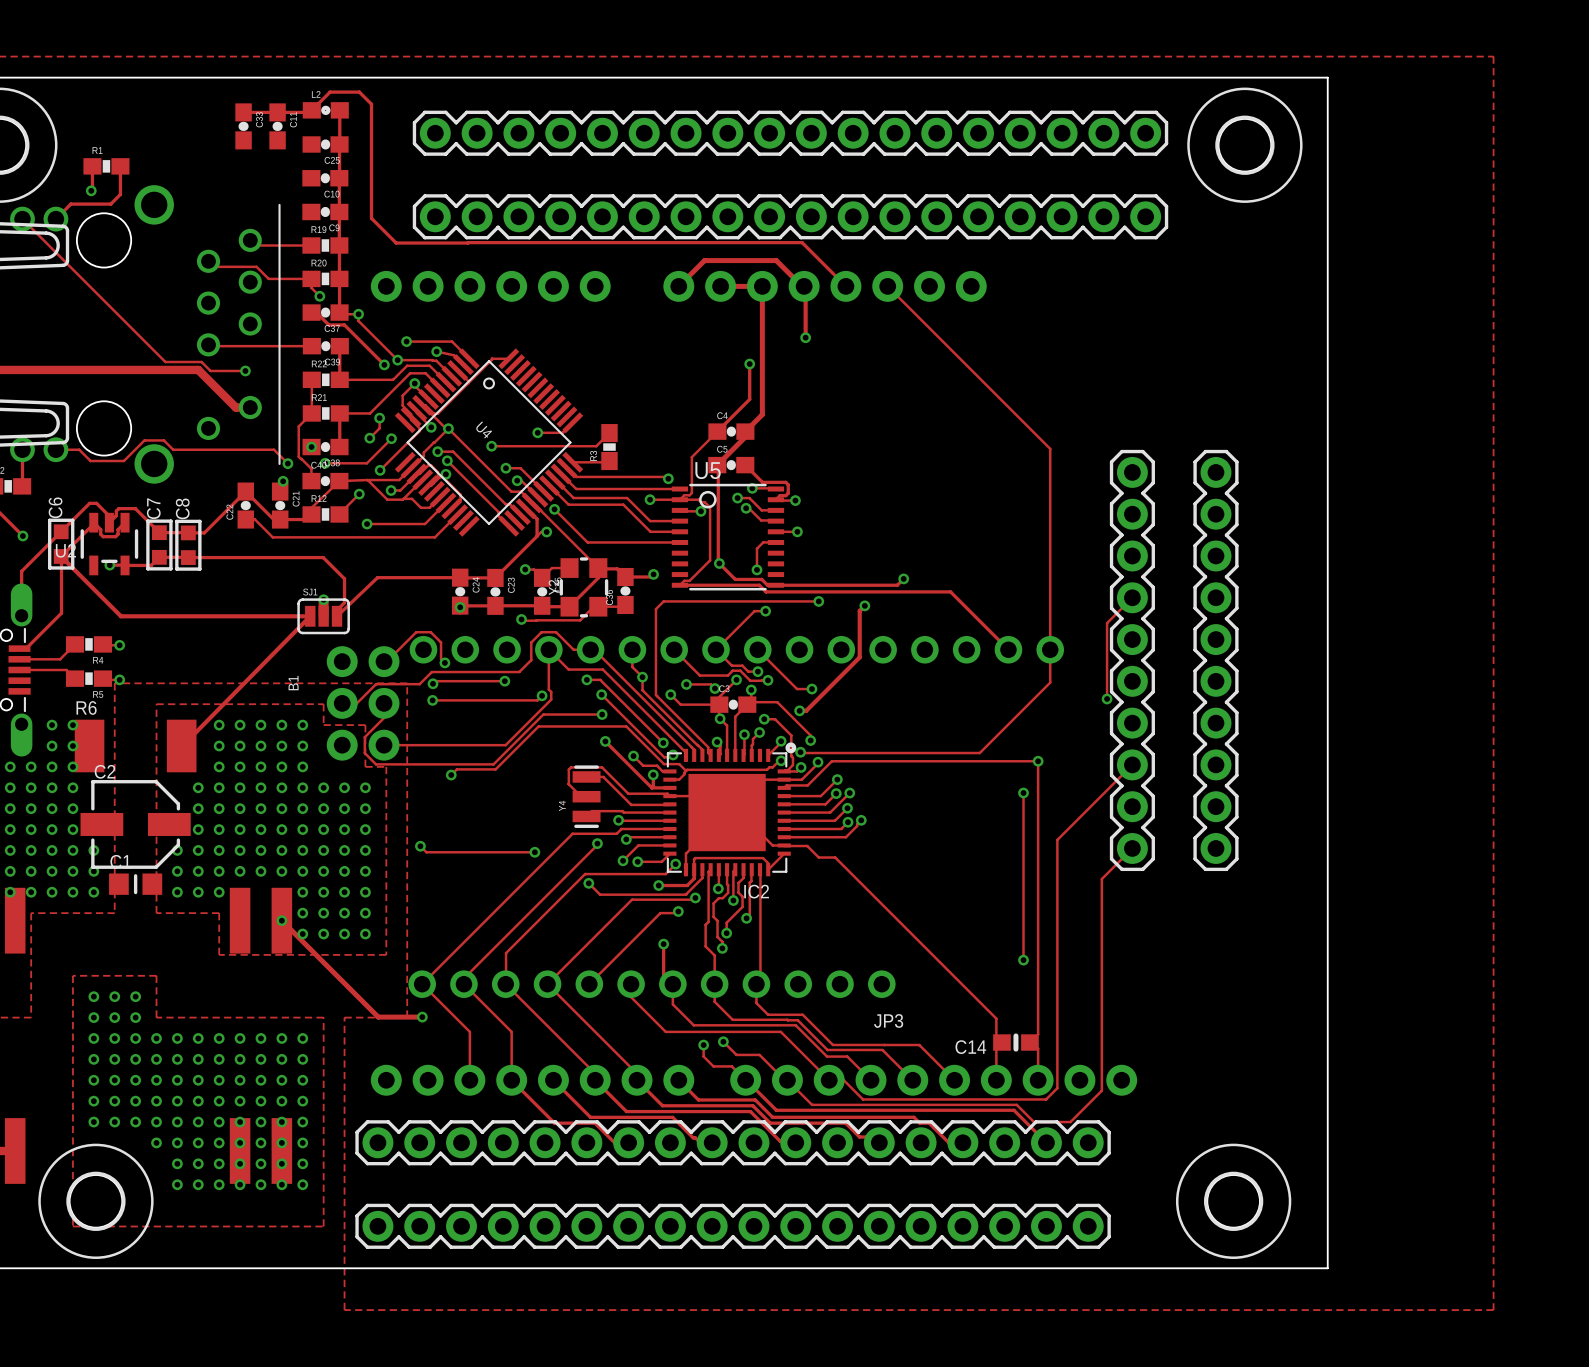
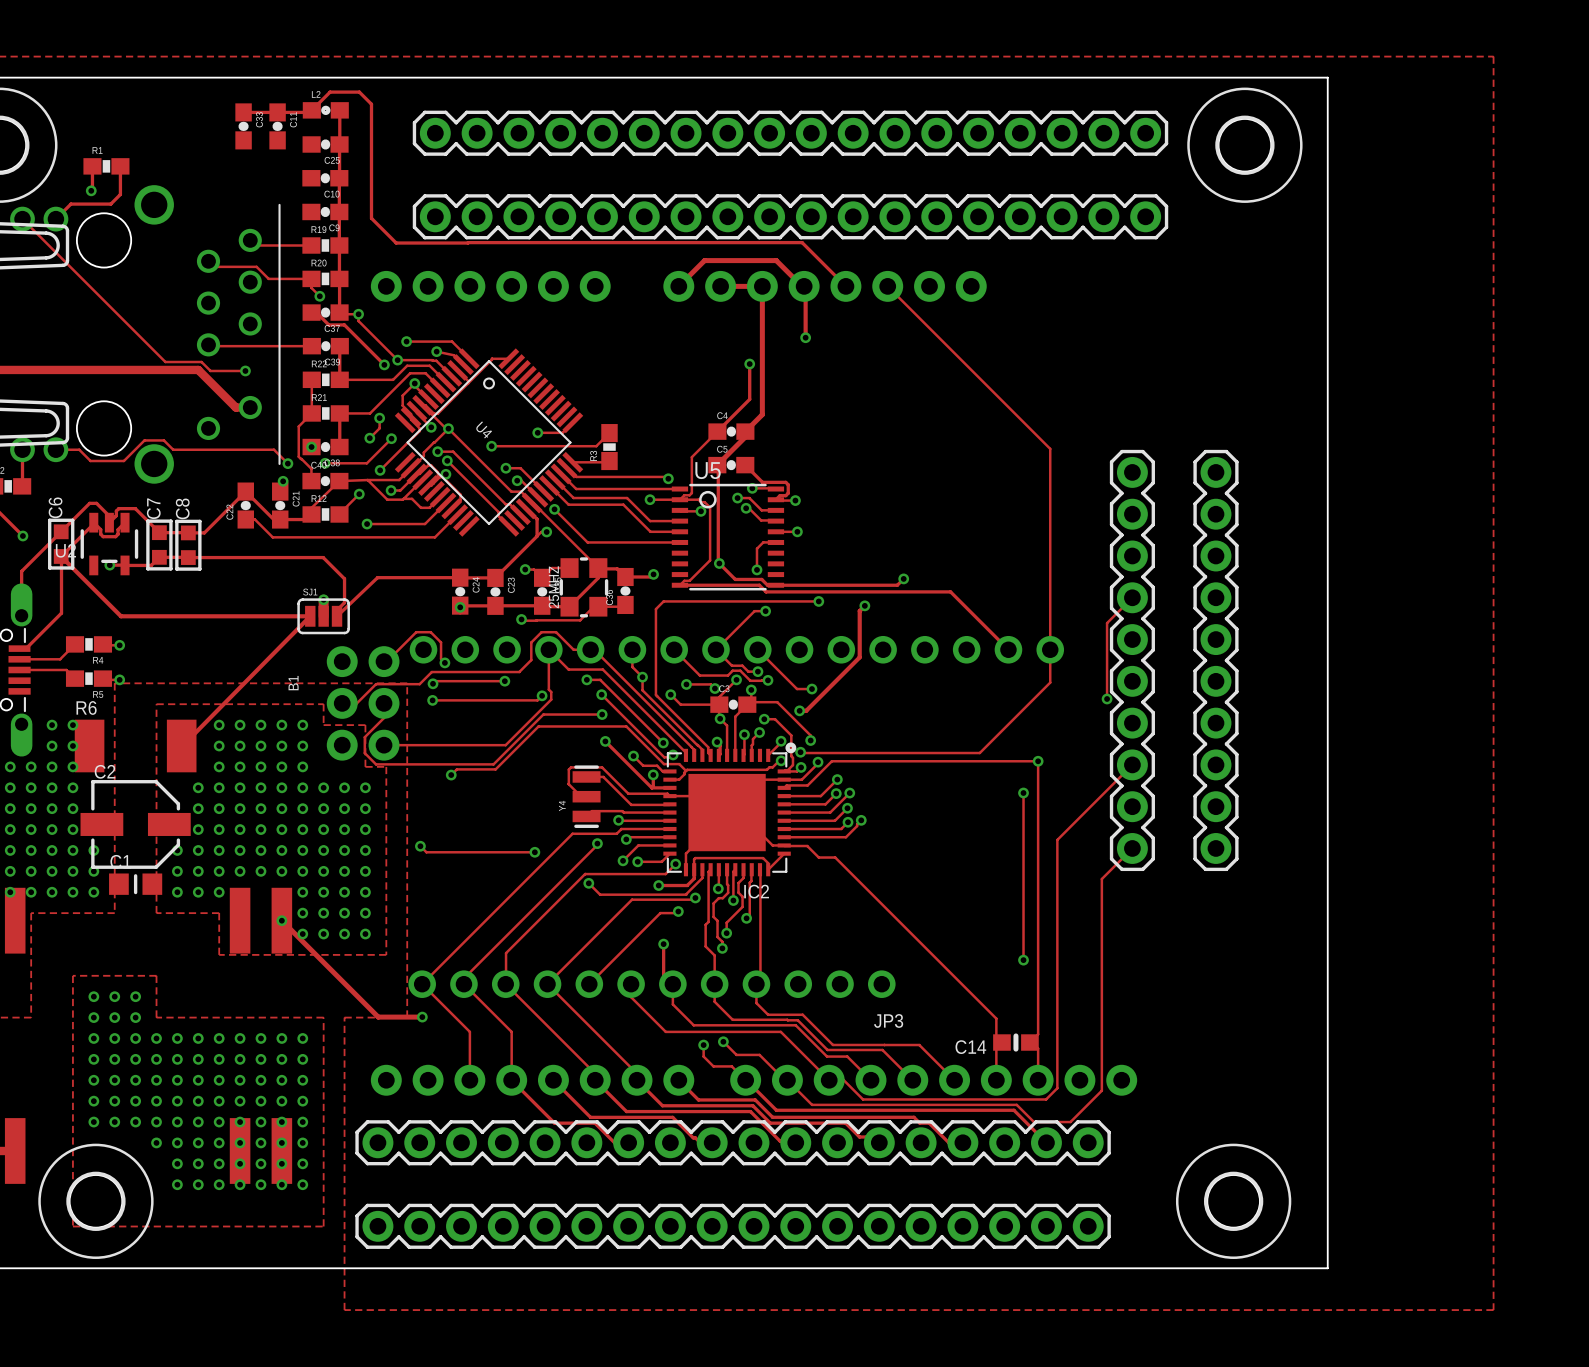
Y2 name: Y2 (553, 587) -> 25MHZ (553, 587)

